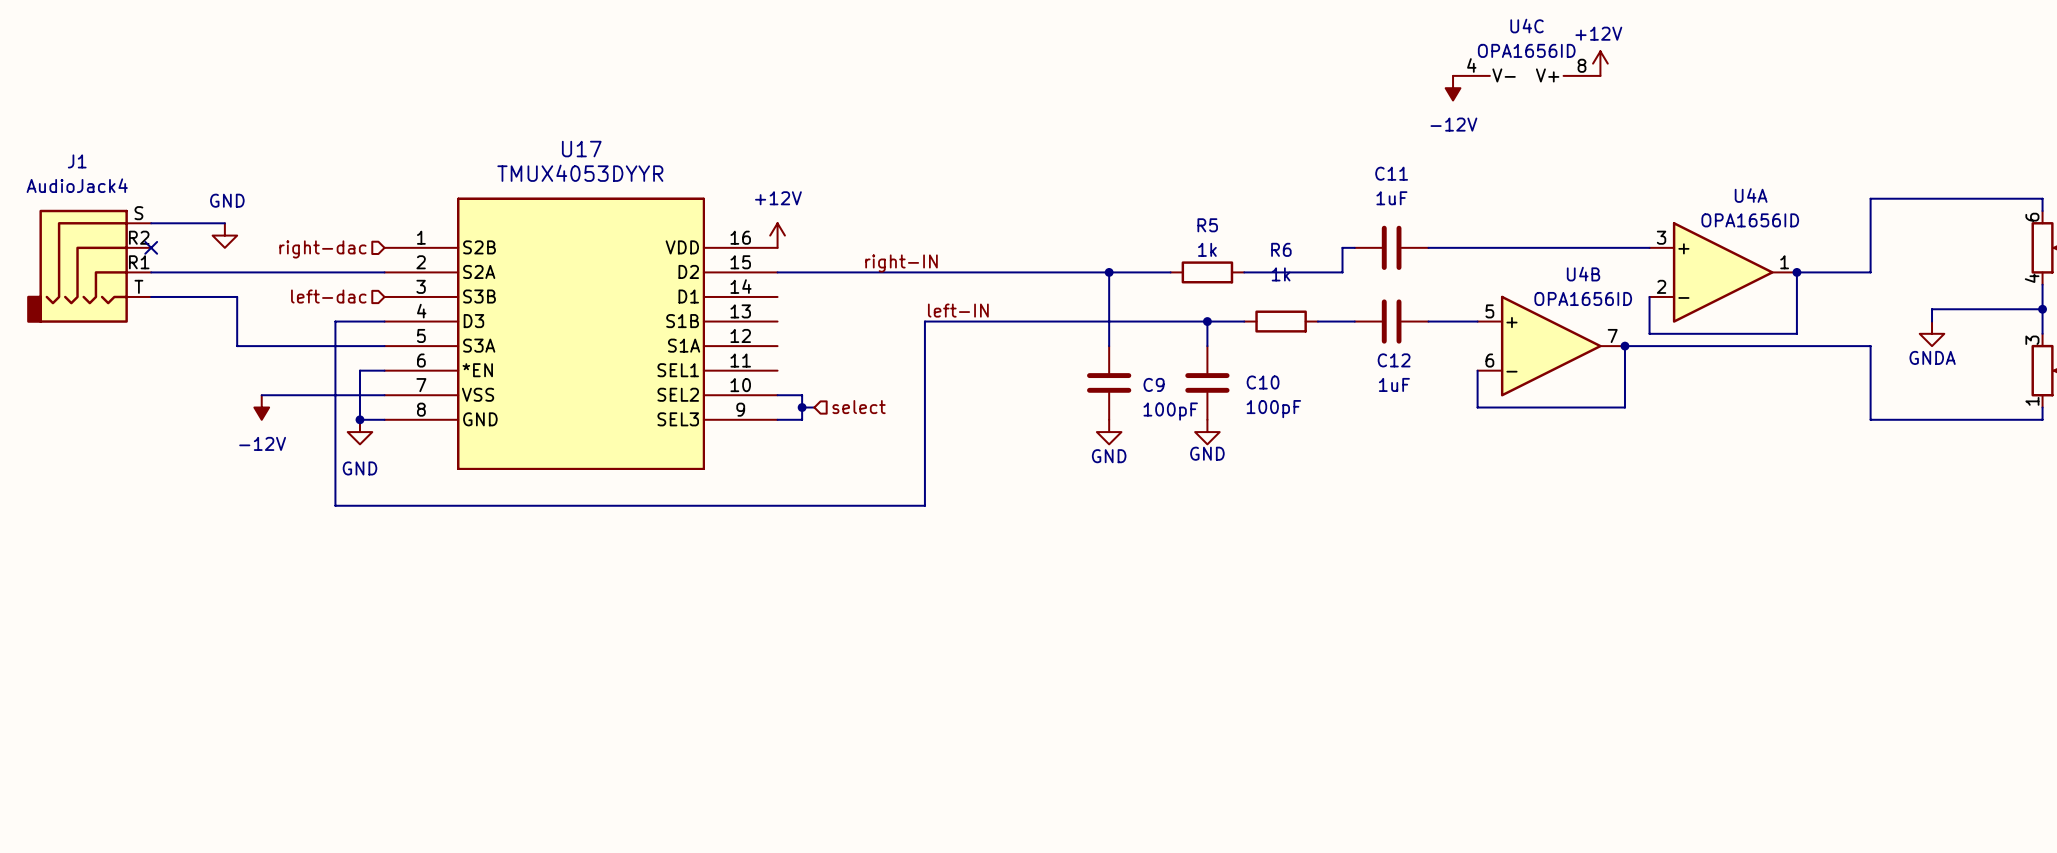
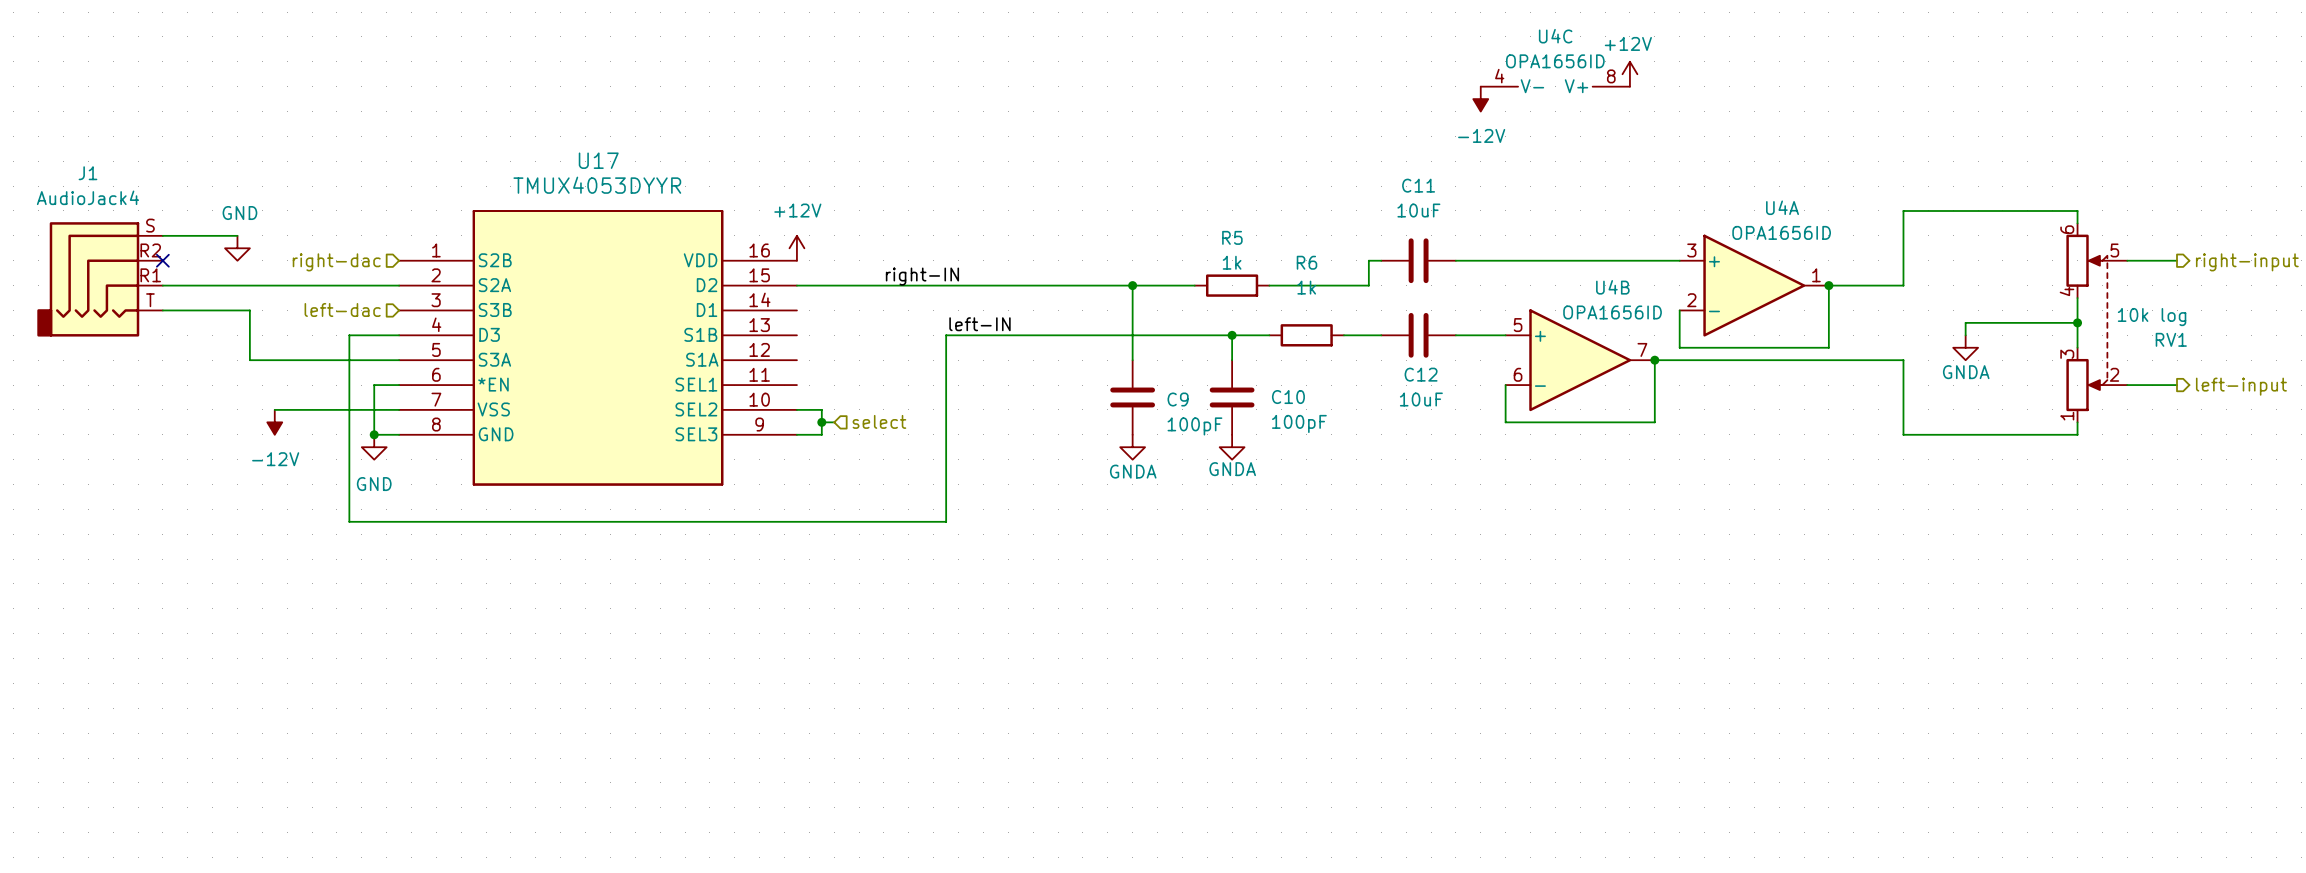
C11 value: 1uF (1391, 198) -> 10uF (1418, 210)
C12 value: 1uF (1394, 384) -> 10uF (1421, 399)
power symbol: GND (1109, 432) -> GNDA (1132, 447)
power symbol: GND (1207, 432) -> GNDA (1232, 447)

